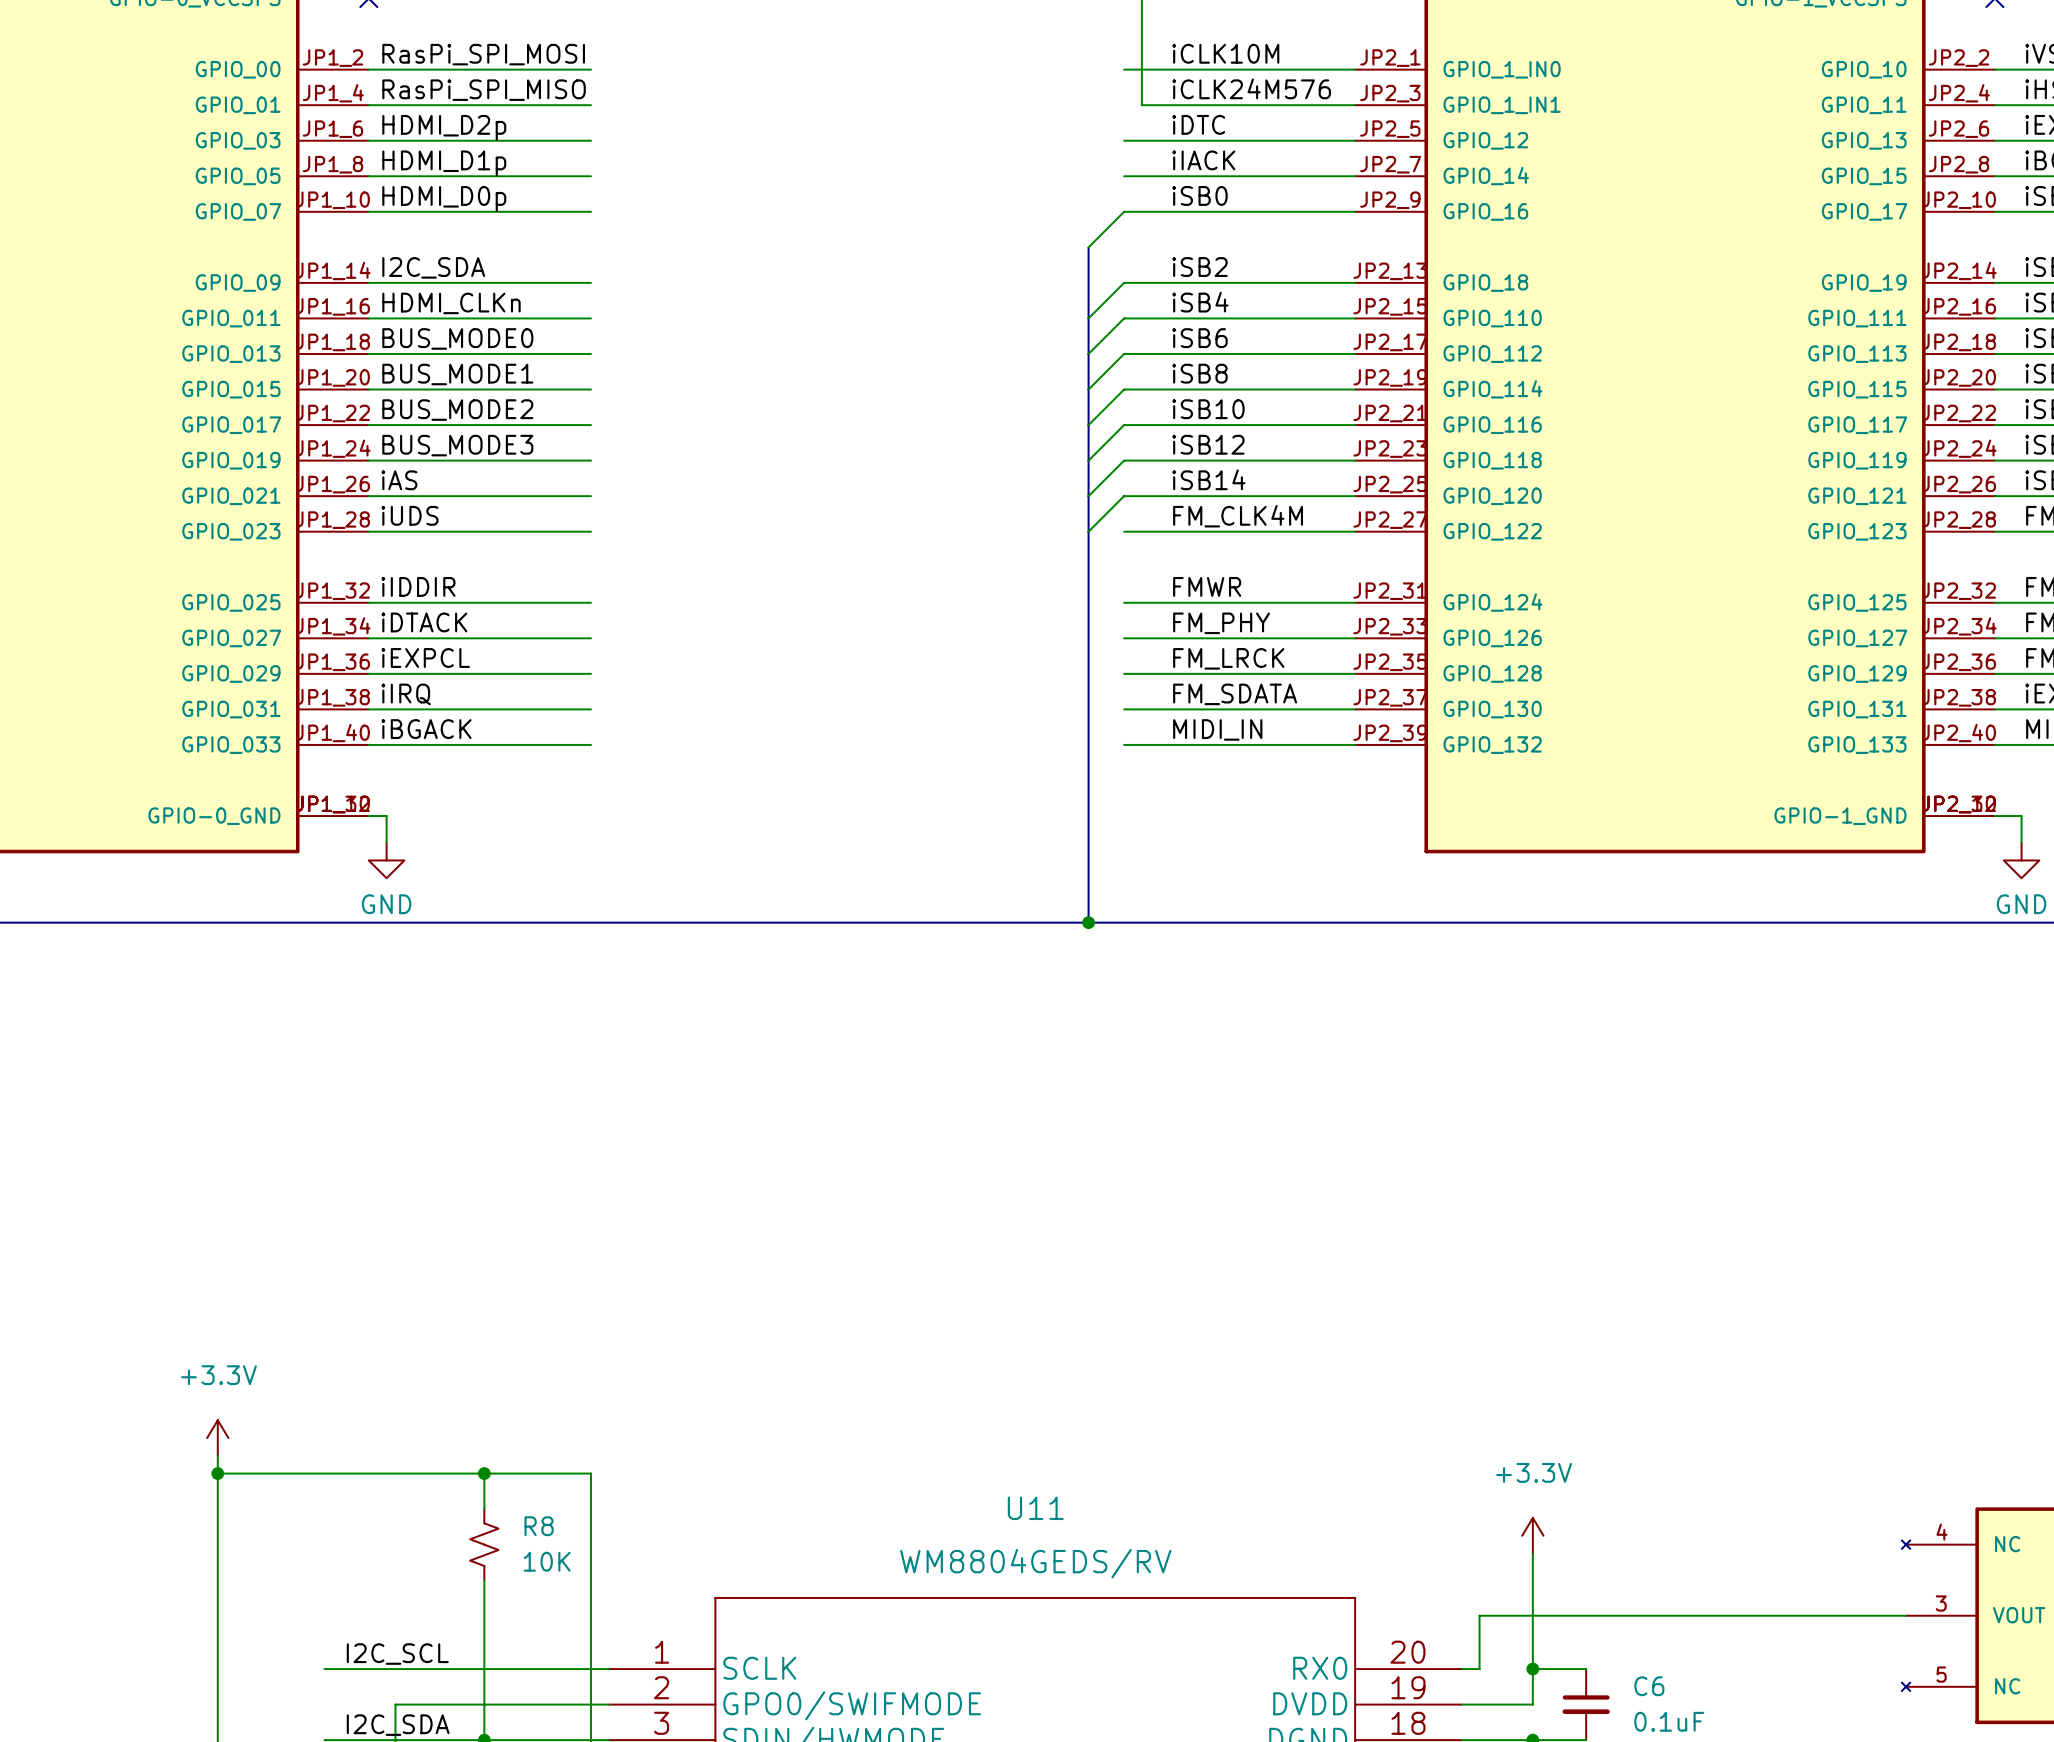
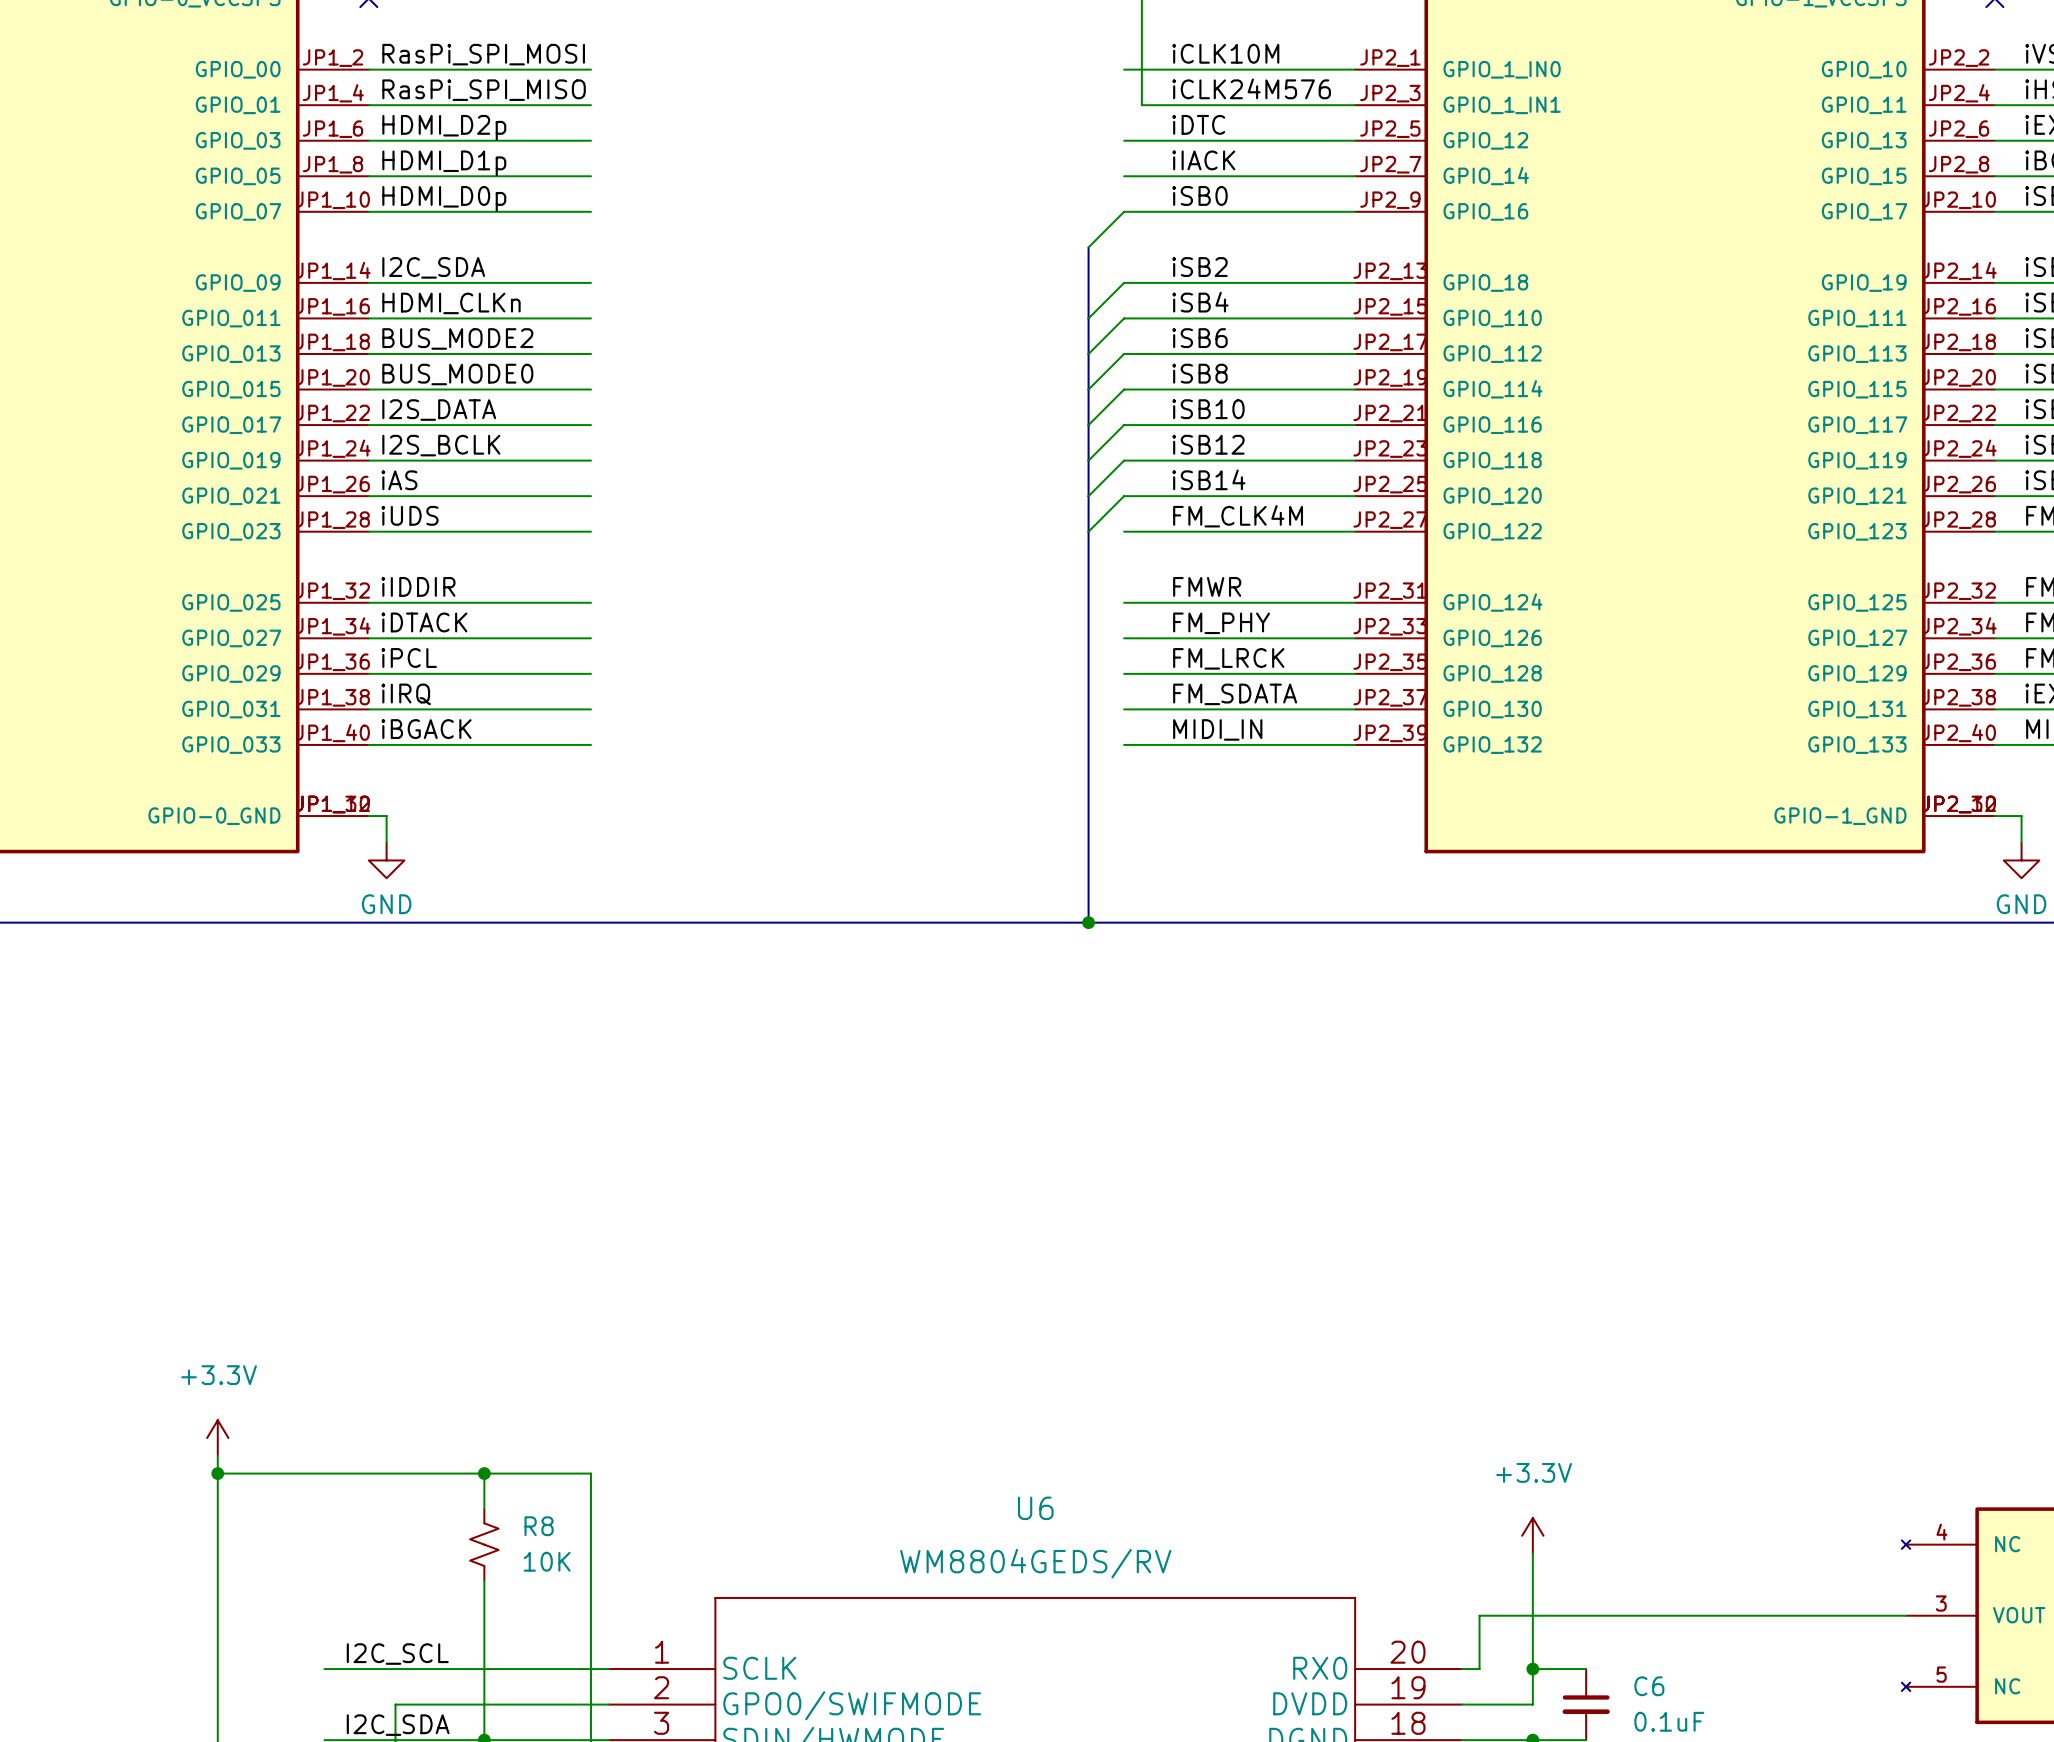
label: BUS_MODE0 (457, 338) -> BUS_MODE2 (457, 338)
label: BUS_MODE1 (457, 374) -> BUS_MODE0 (457, 374)
label: BUS_MODE2 (457, 410) -> I2S_DATA (439, 410)
label: BUS_MODE3 (457, 445) -> I2S_BCLK (441, 445)
label: iEXPCL (425, 658) -> iPCL (409, 658)
U11 name: U11 (1035, 1508) -> U6 (1035, 1508)

